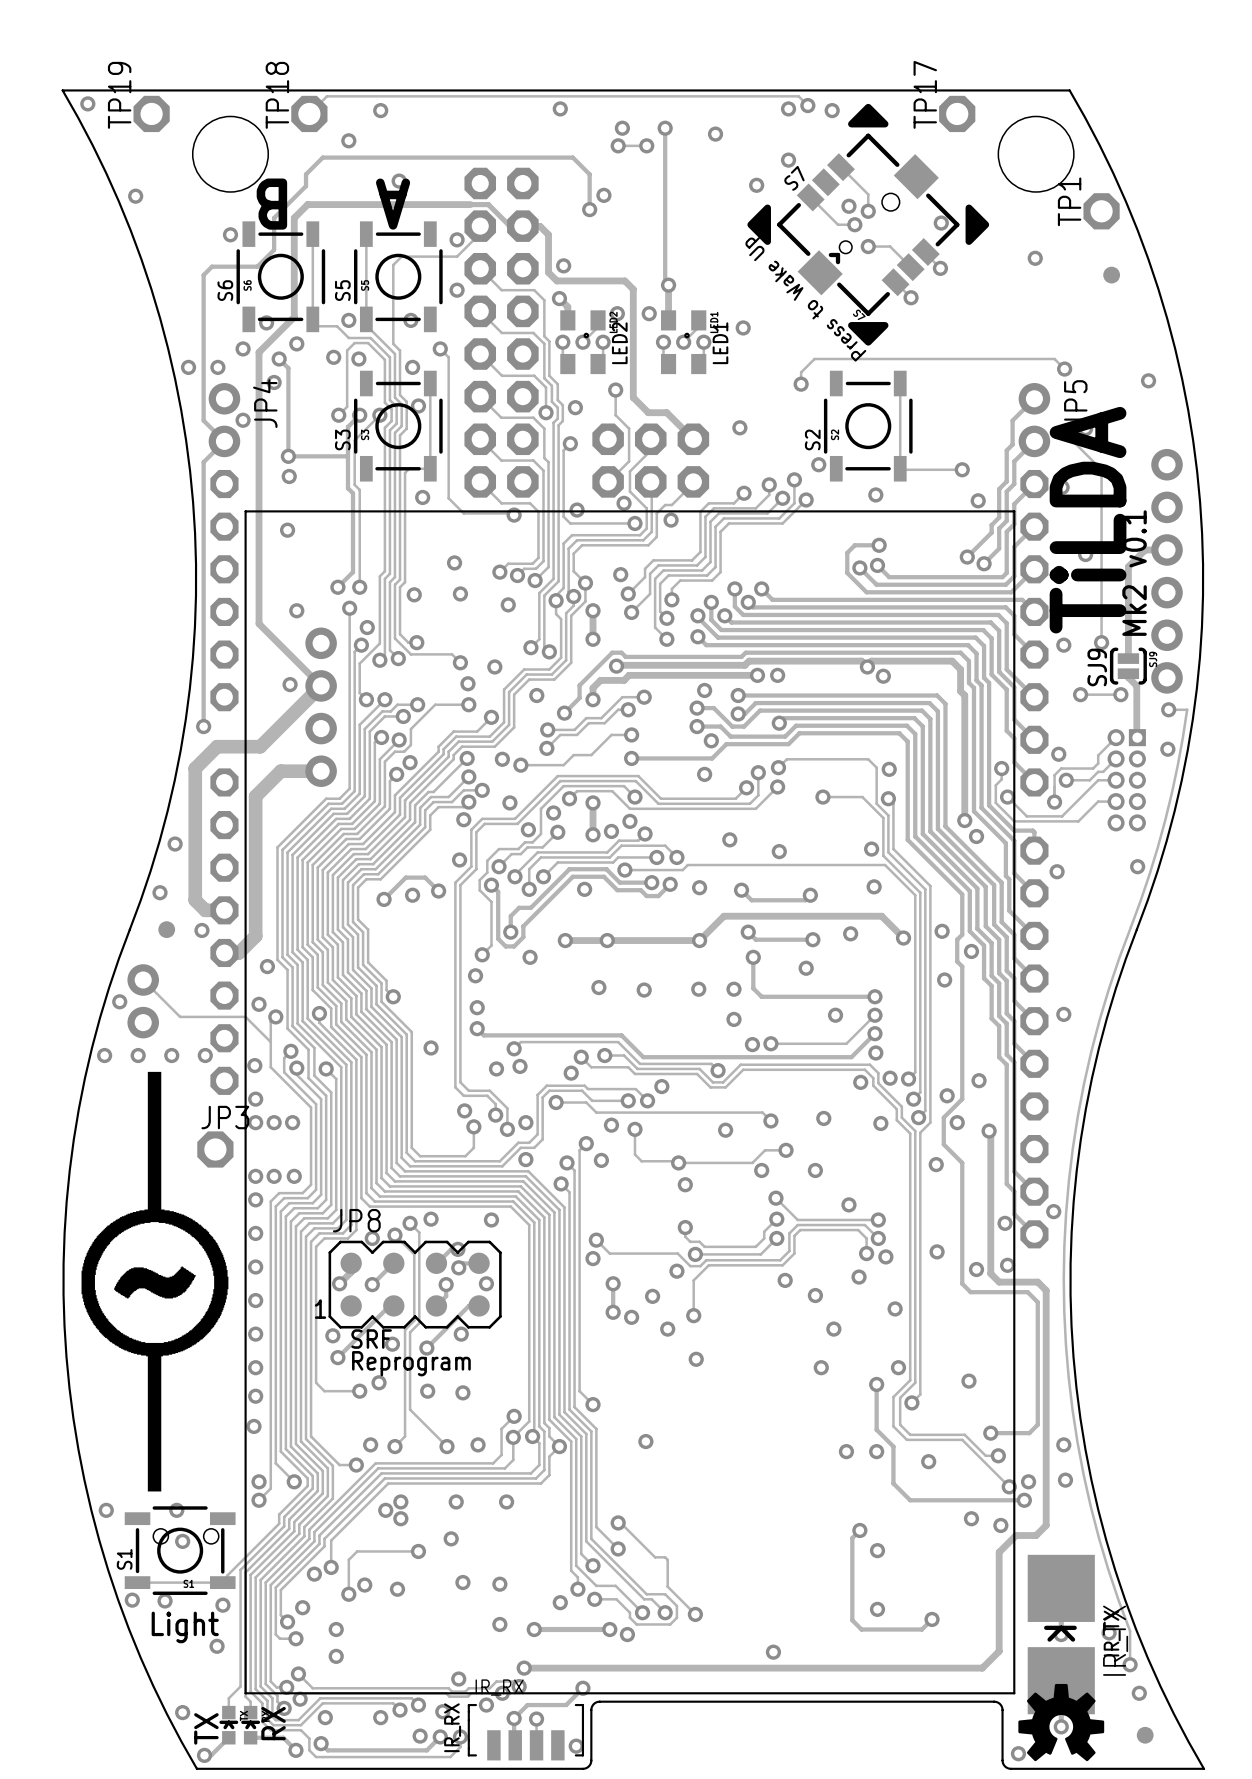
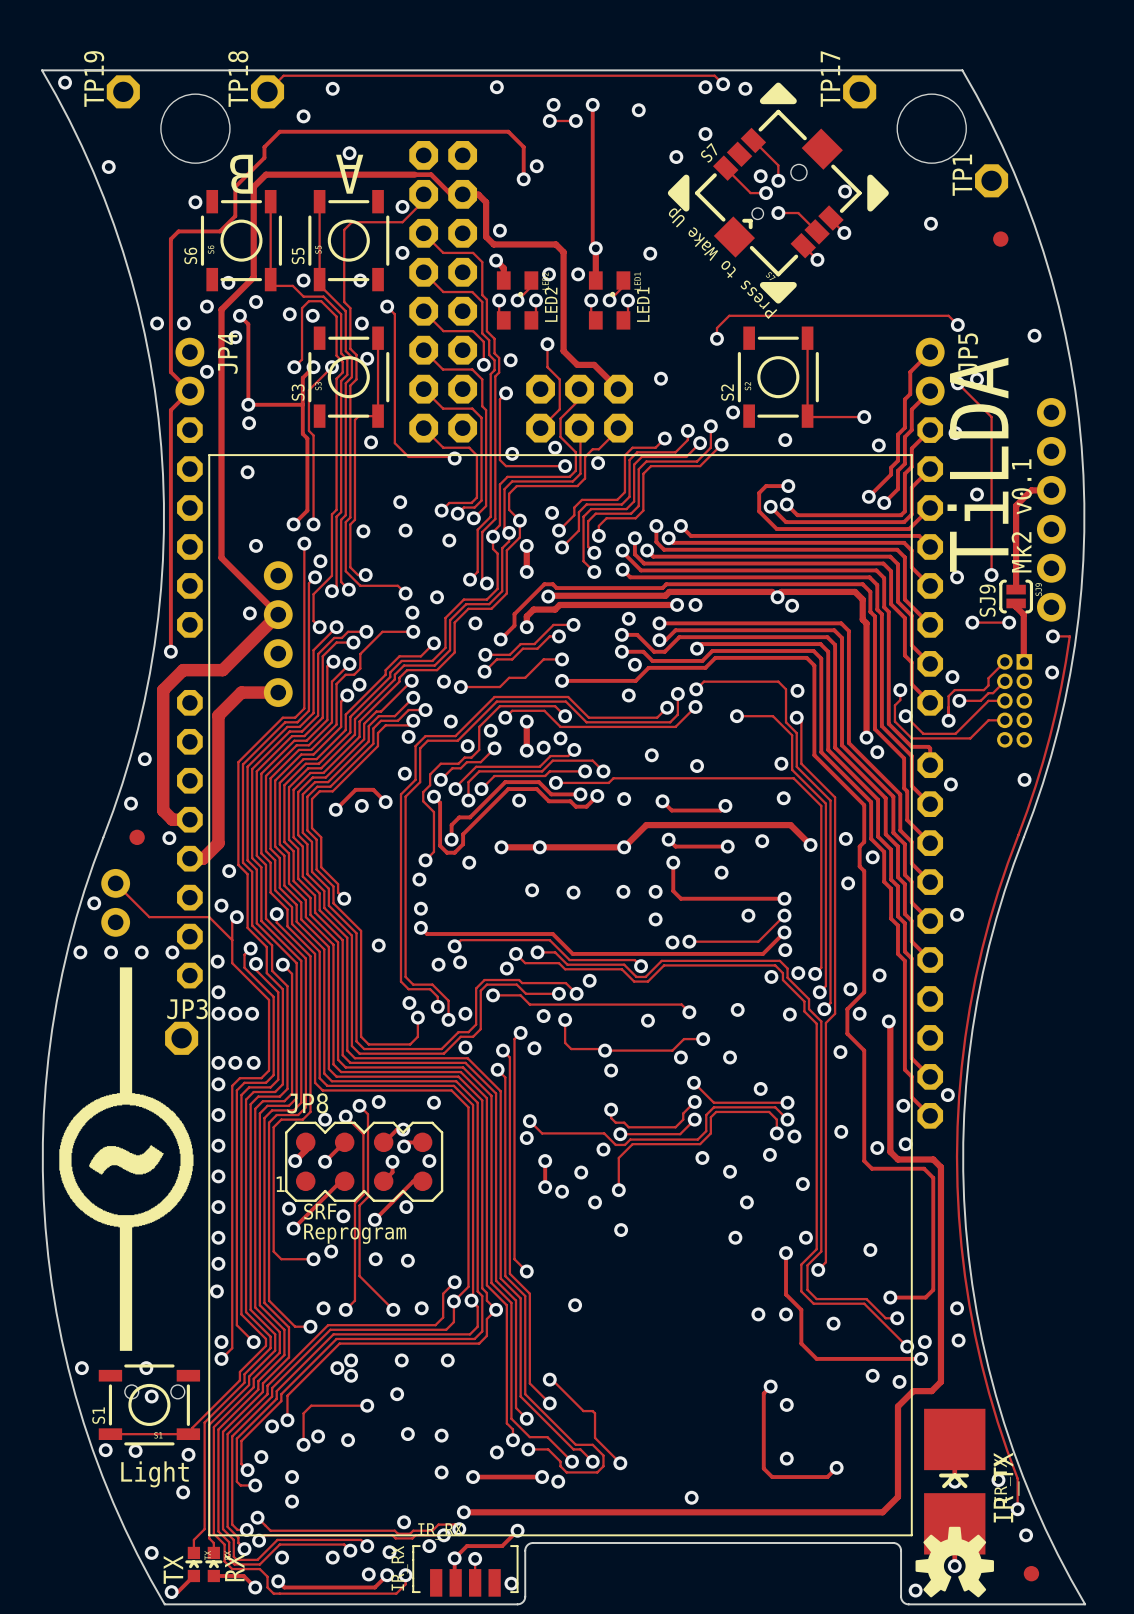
via position: (743, 327) -> (650, 253)

